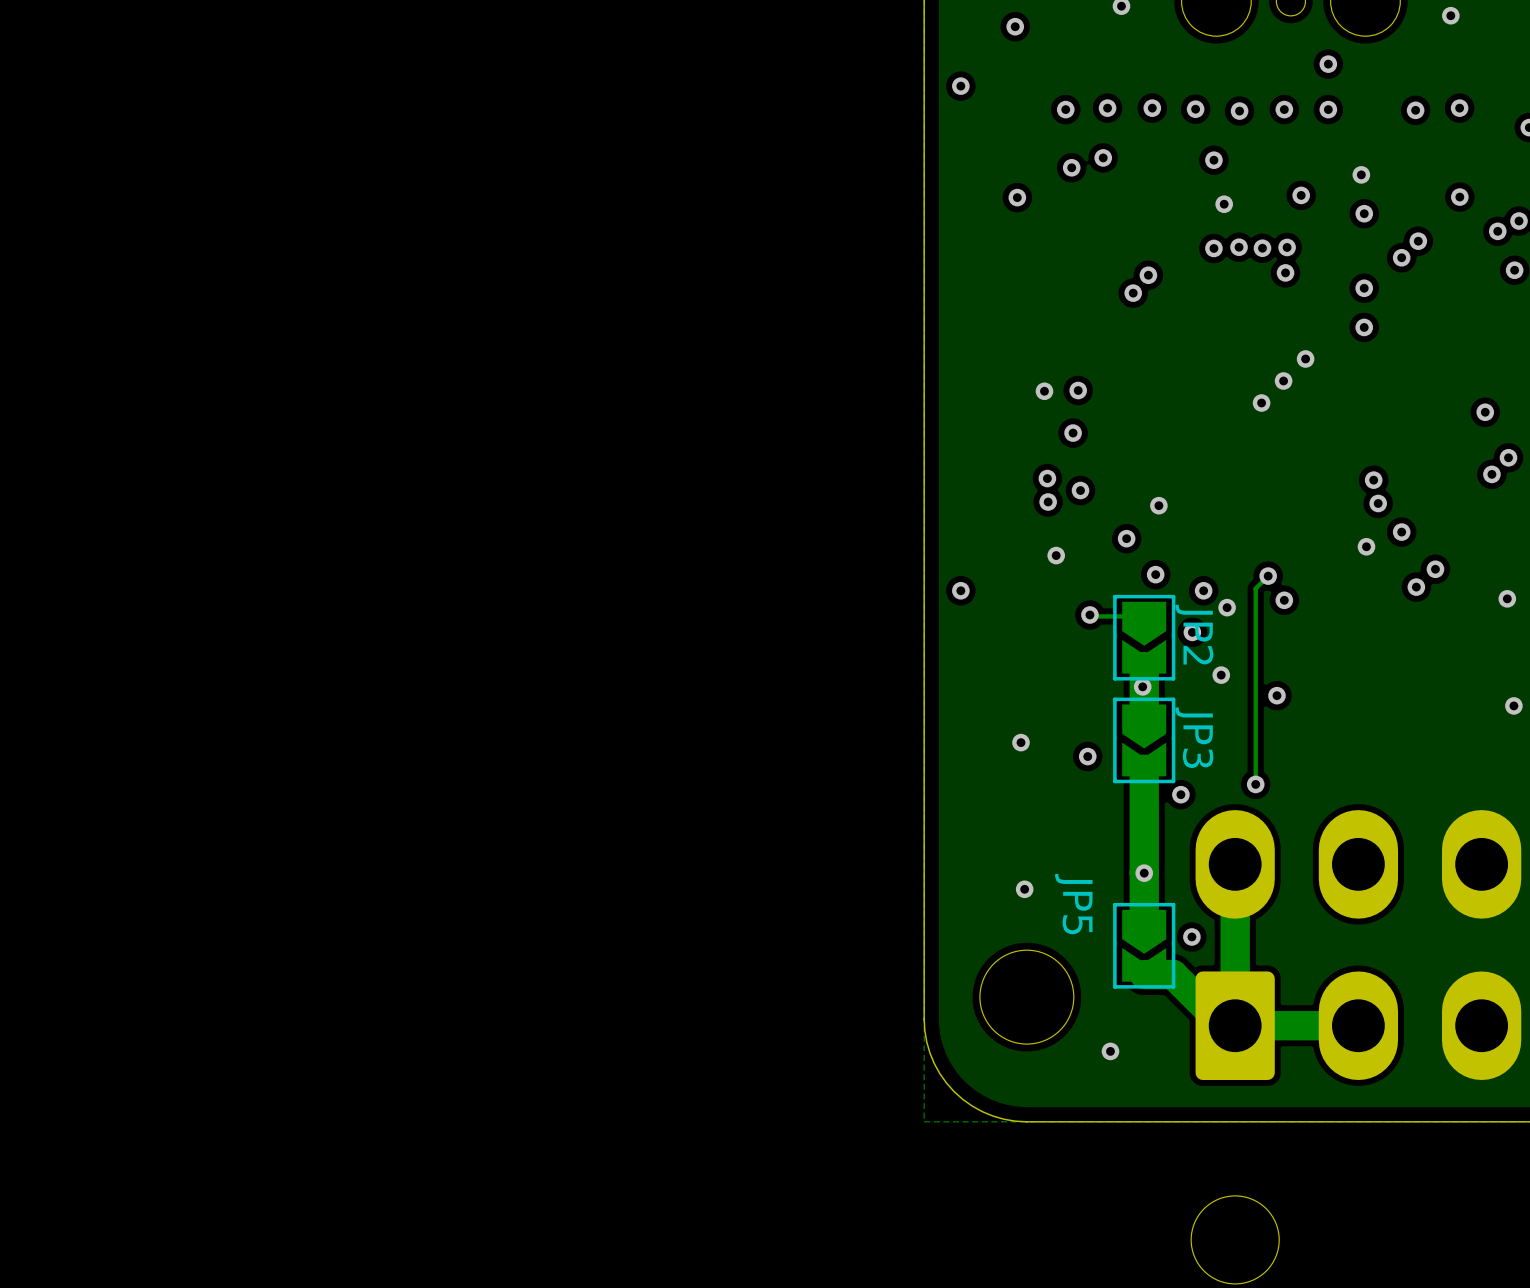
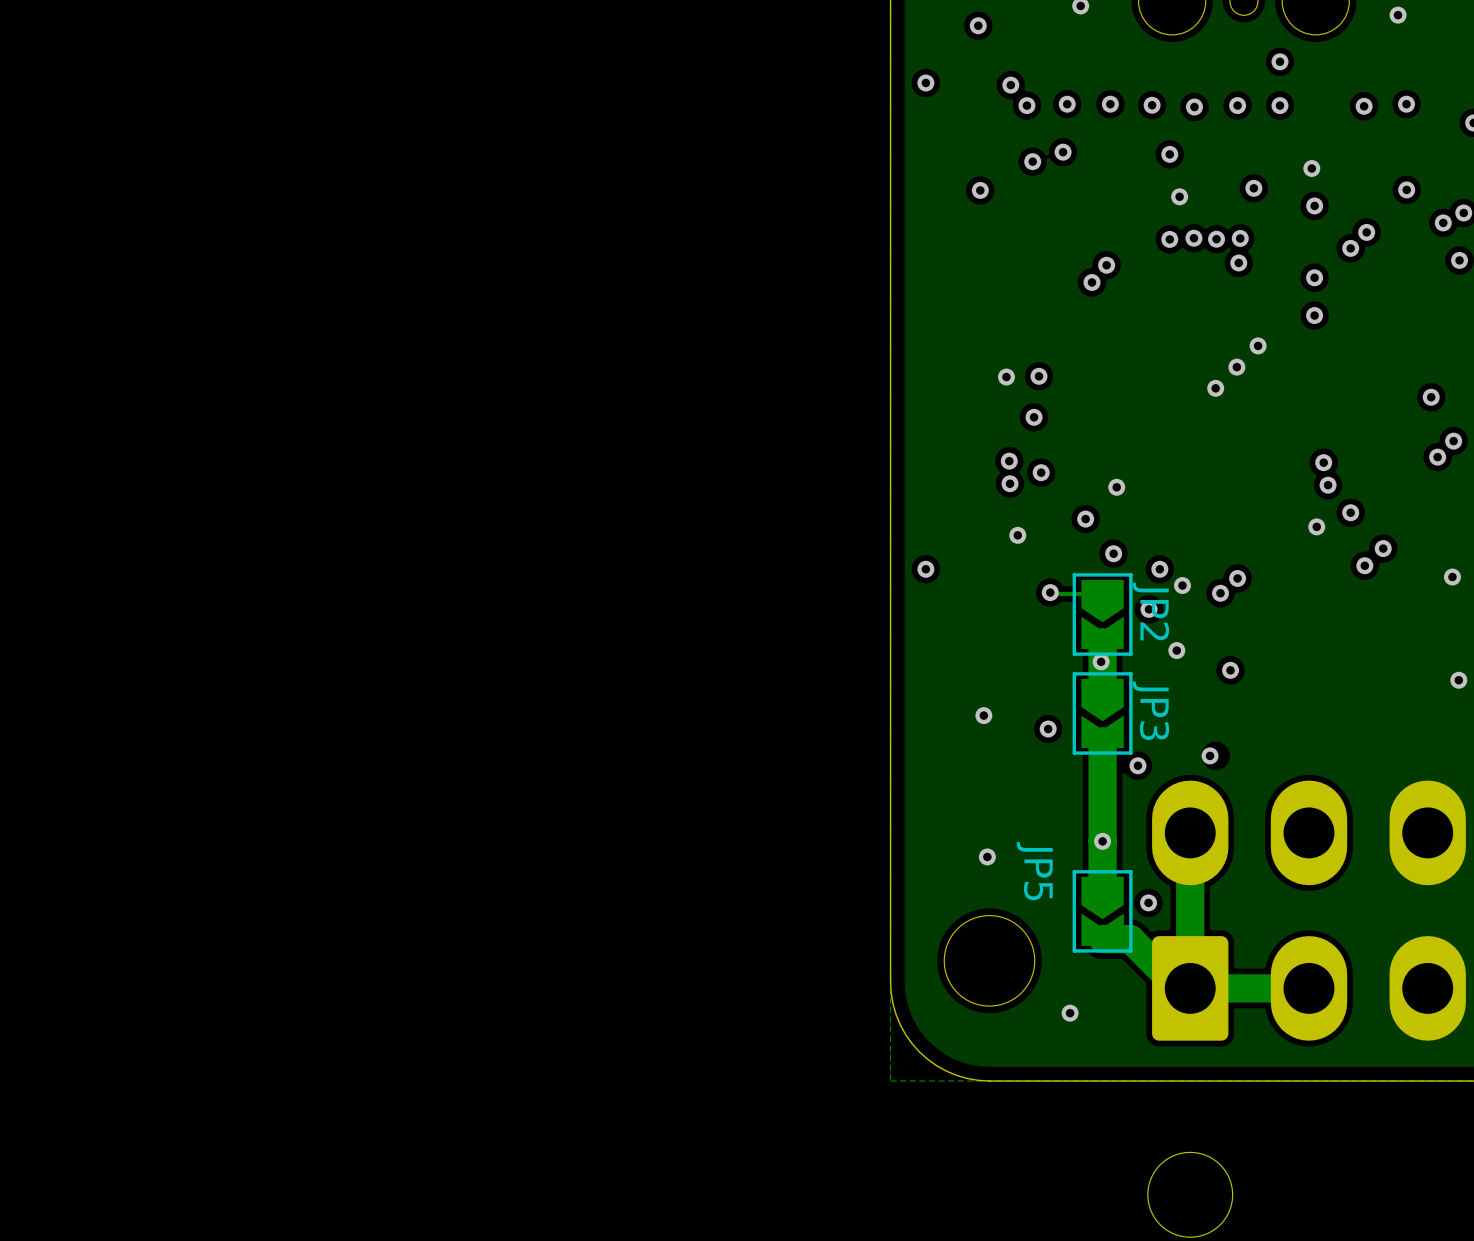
via: none -> (1010, 85)
track: (1268, 576) (1255, 588) (1255, 784) -> none
via position: (1268, 576) -> (1220, 593)

